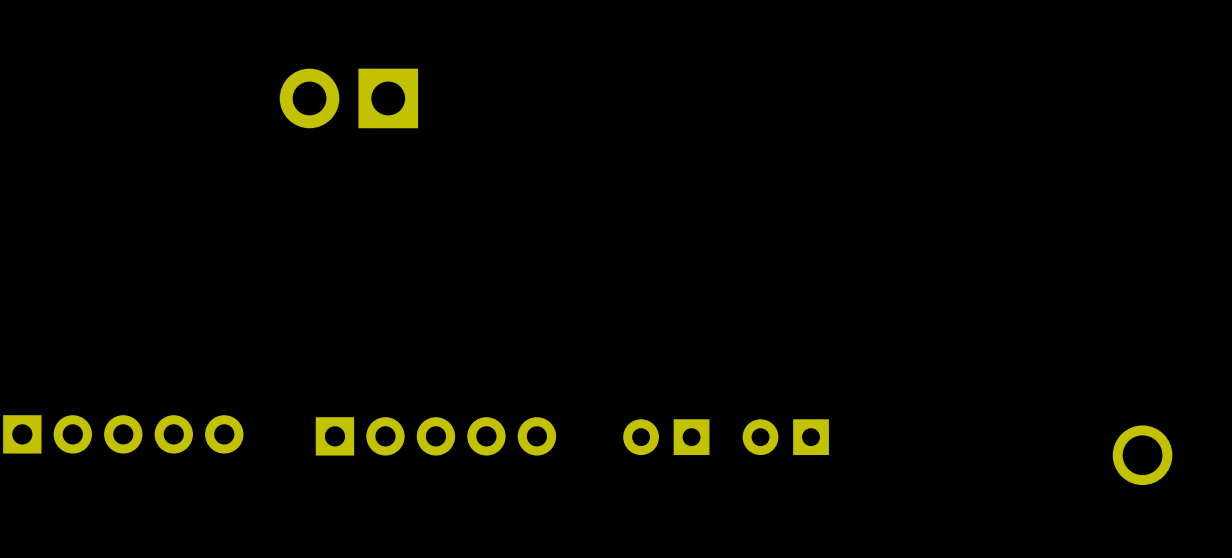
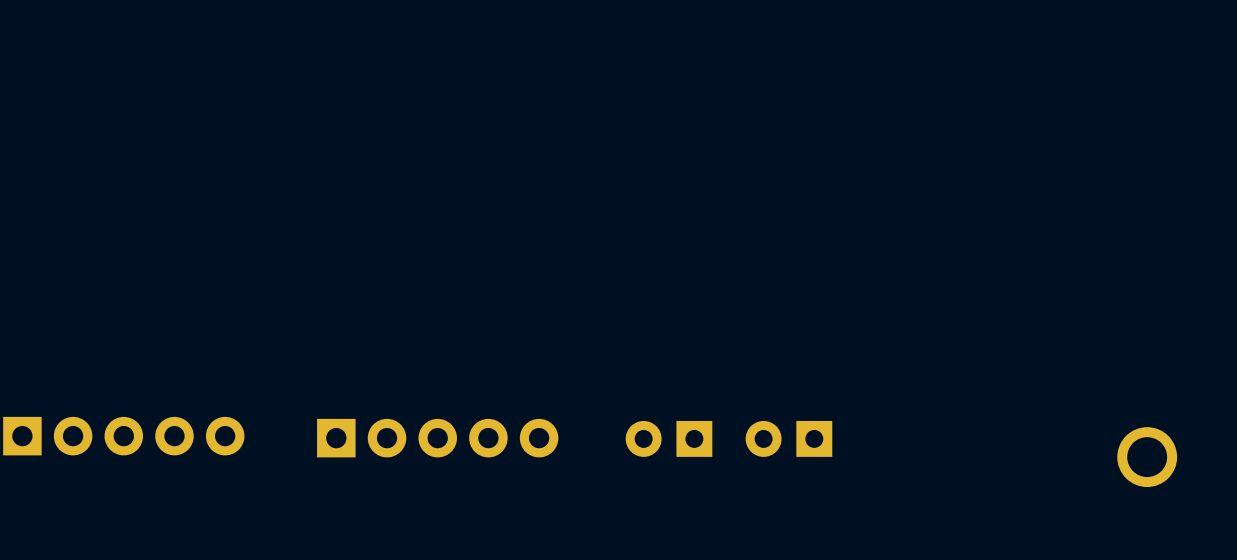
part: (348, 98) -> none

